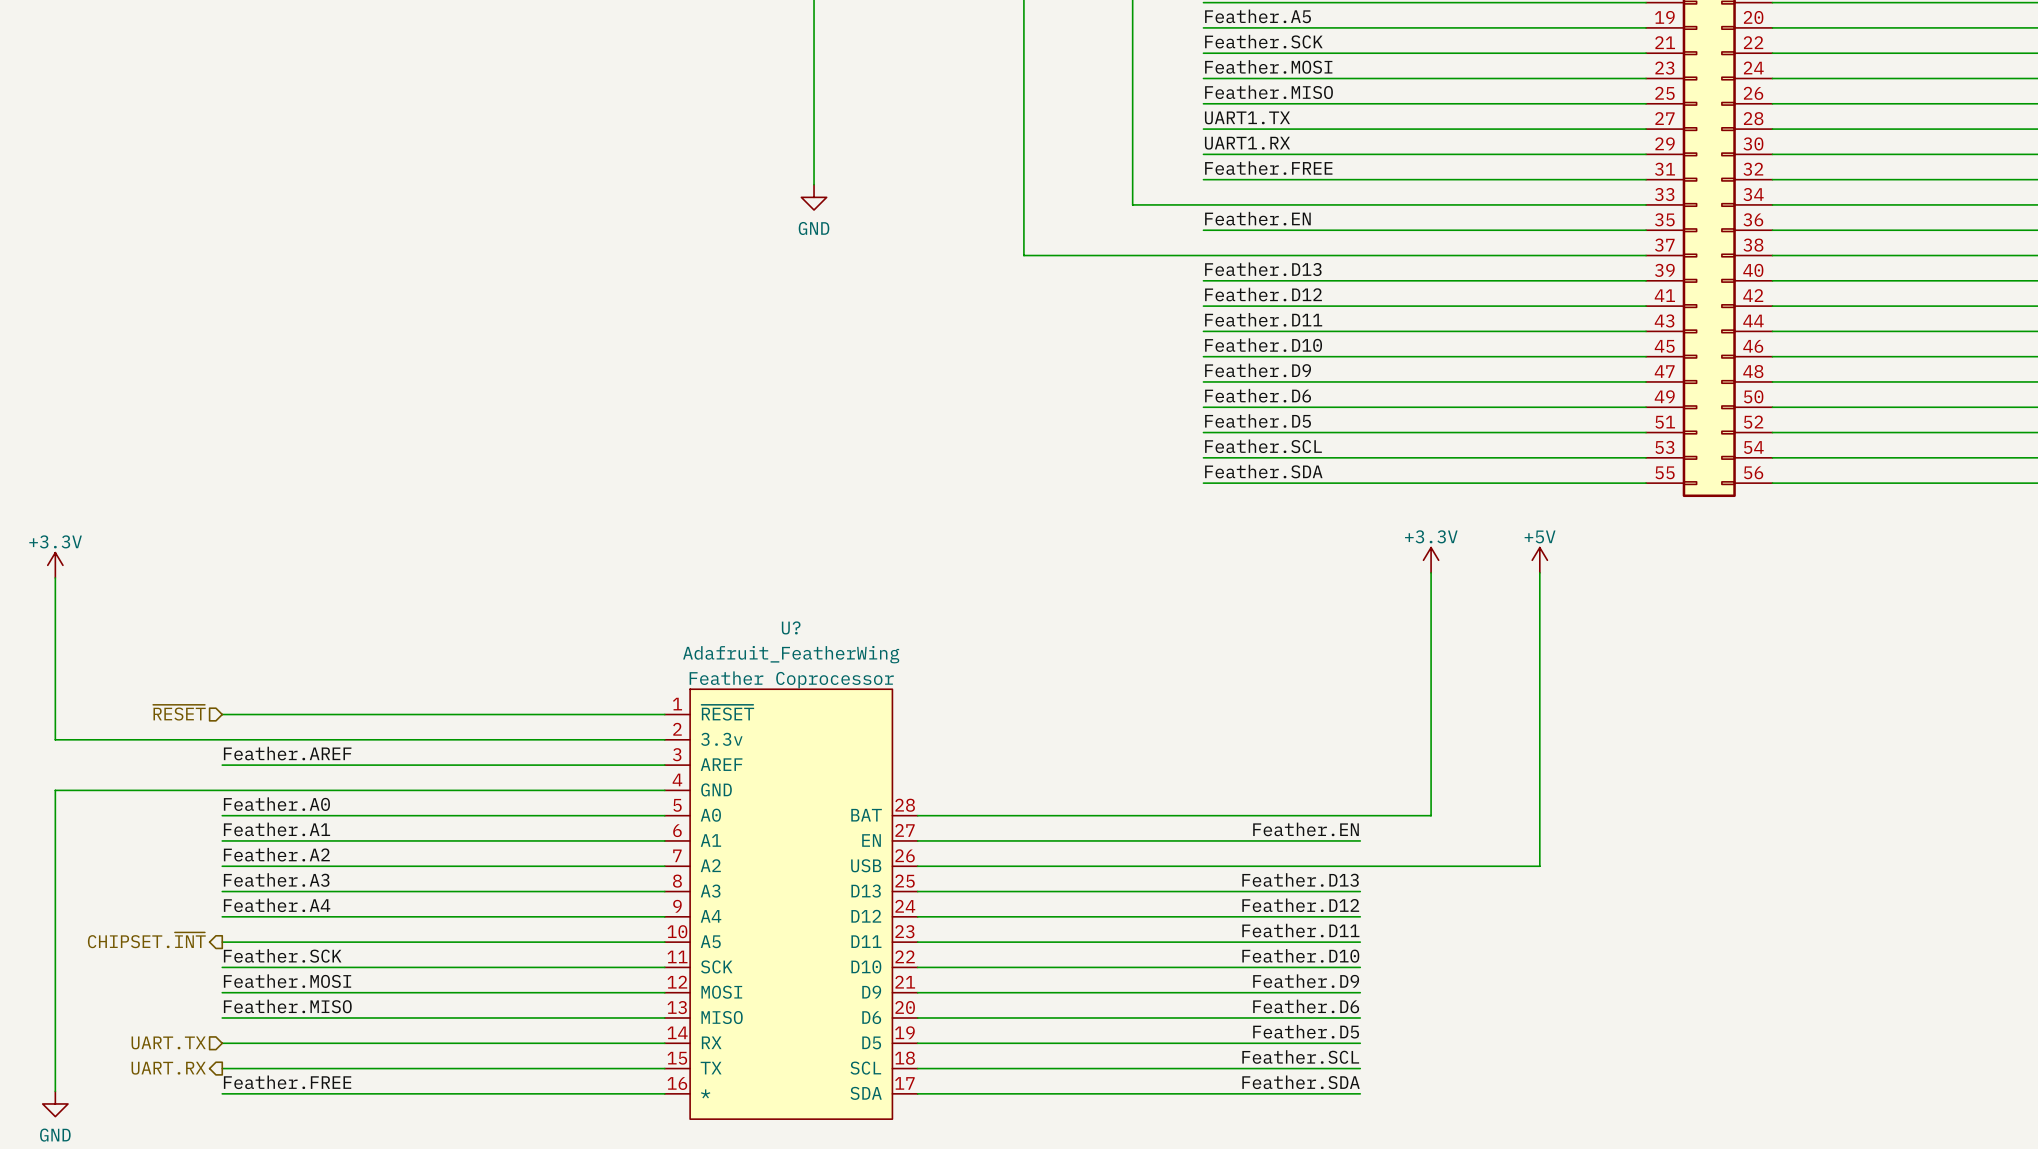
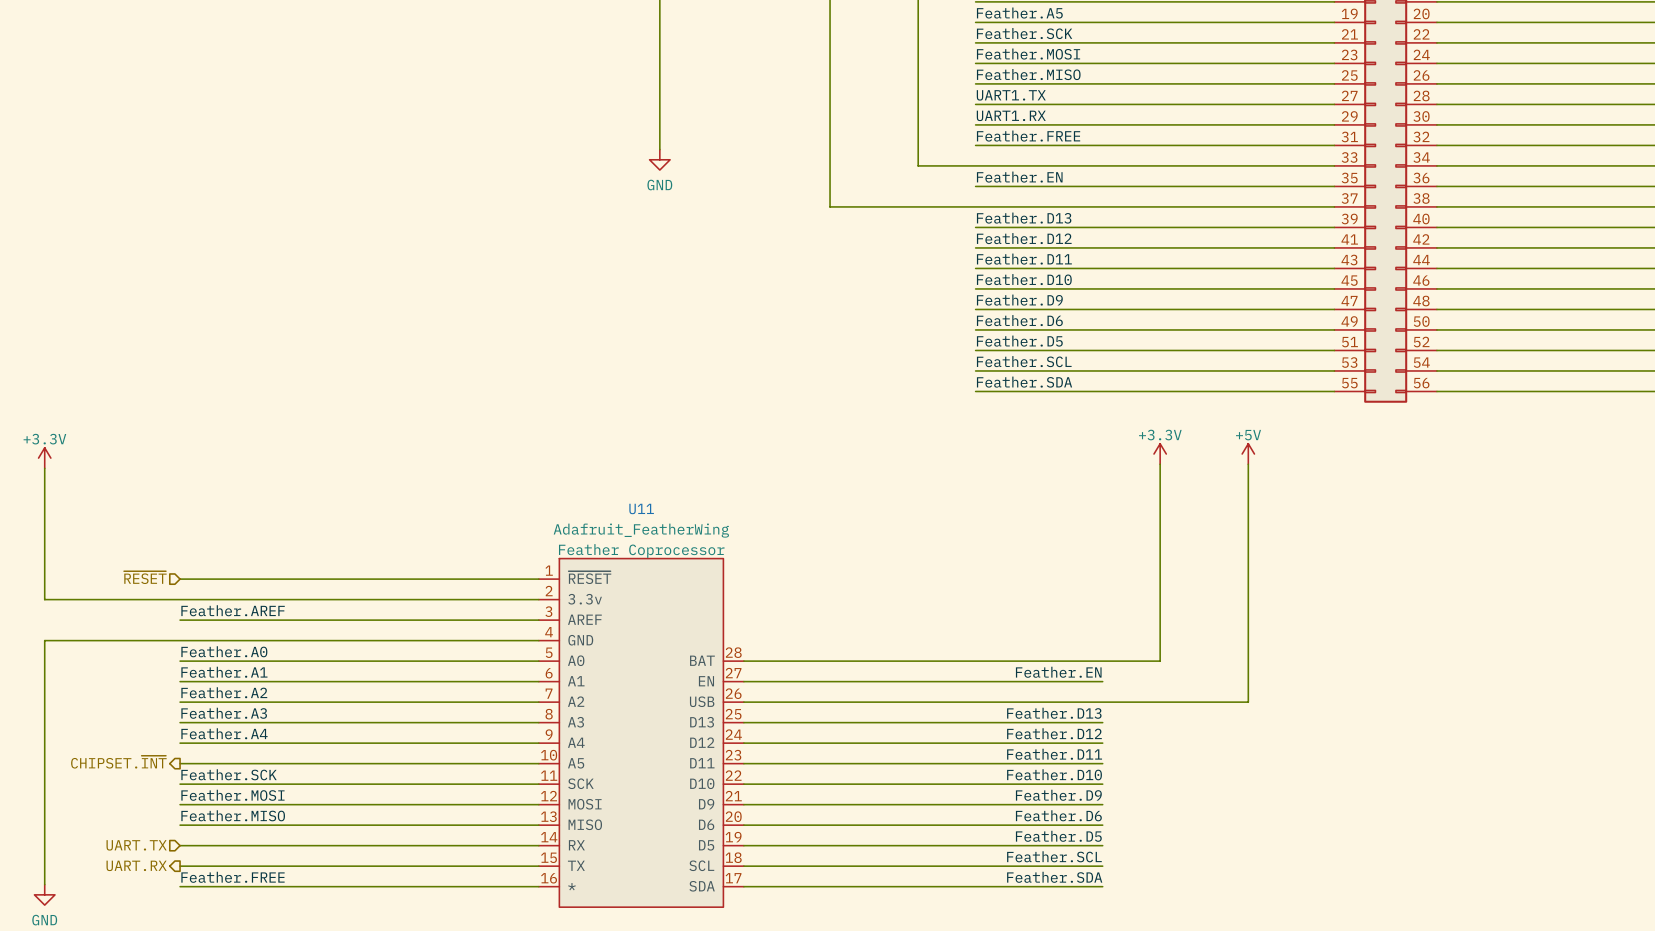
U? name: U? (791, 627) -> U11 (641, 508)

